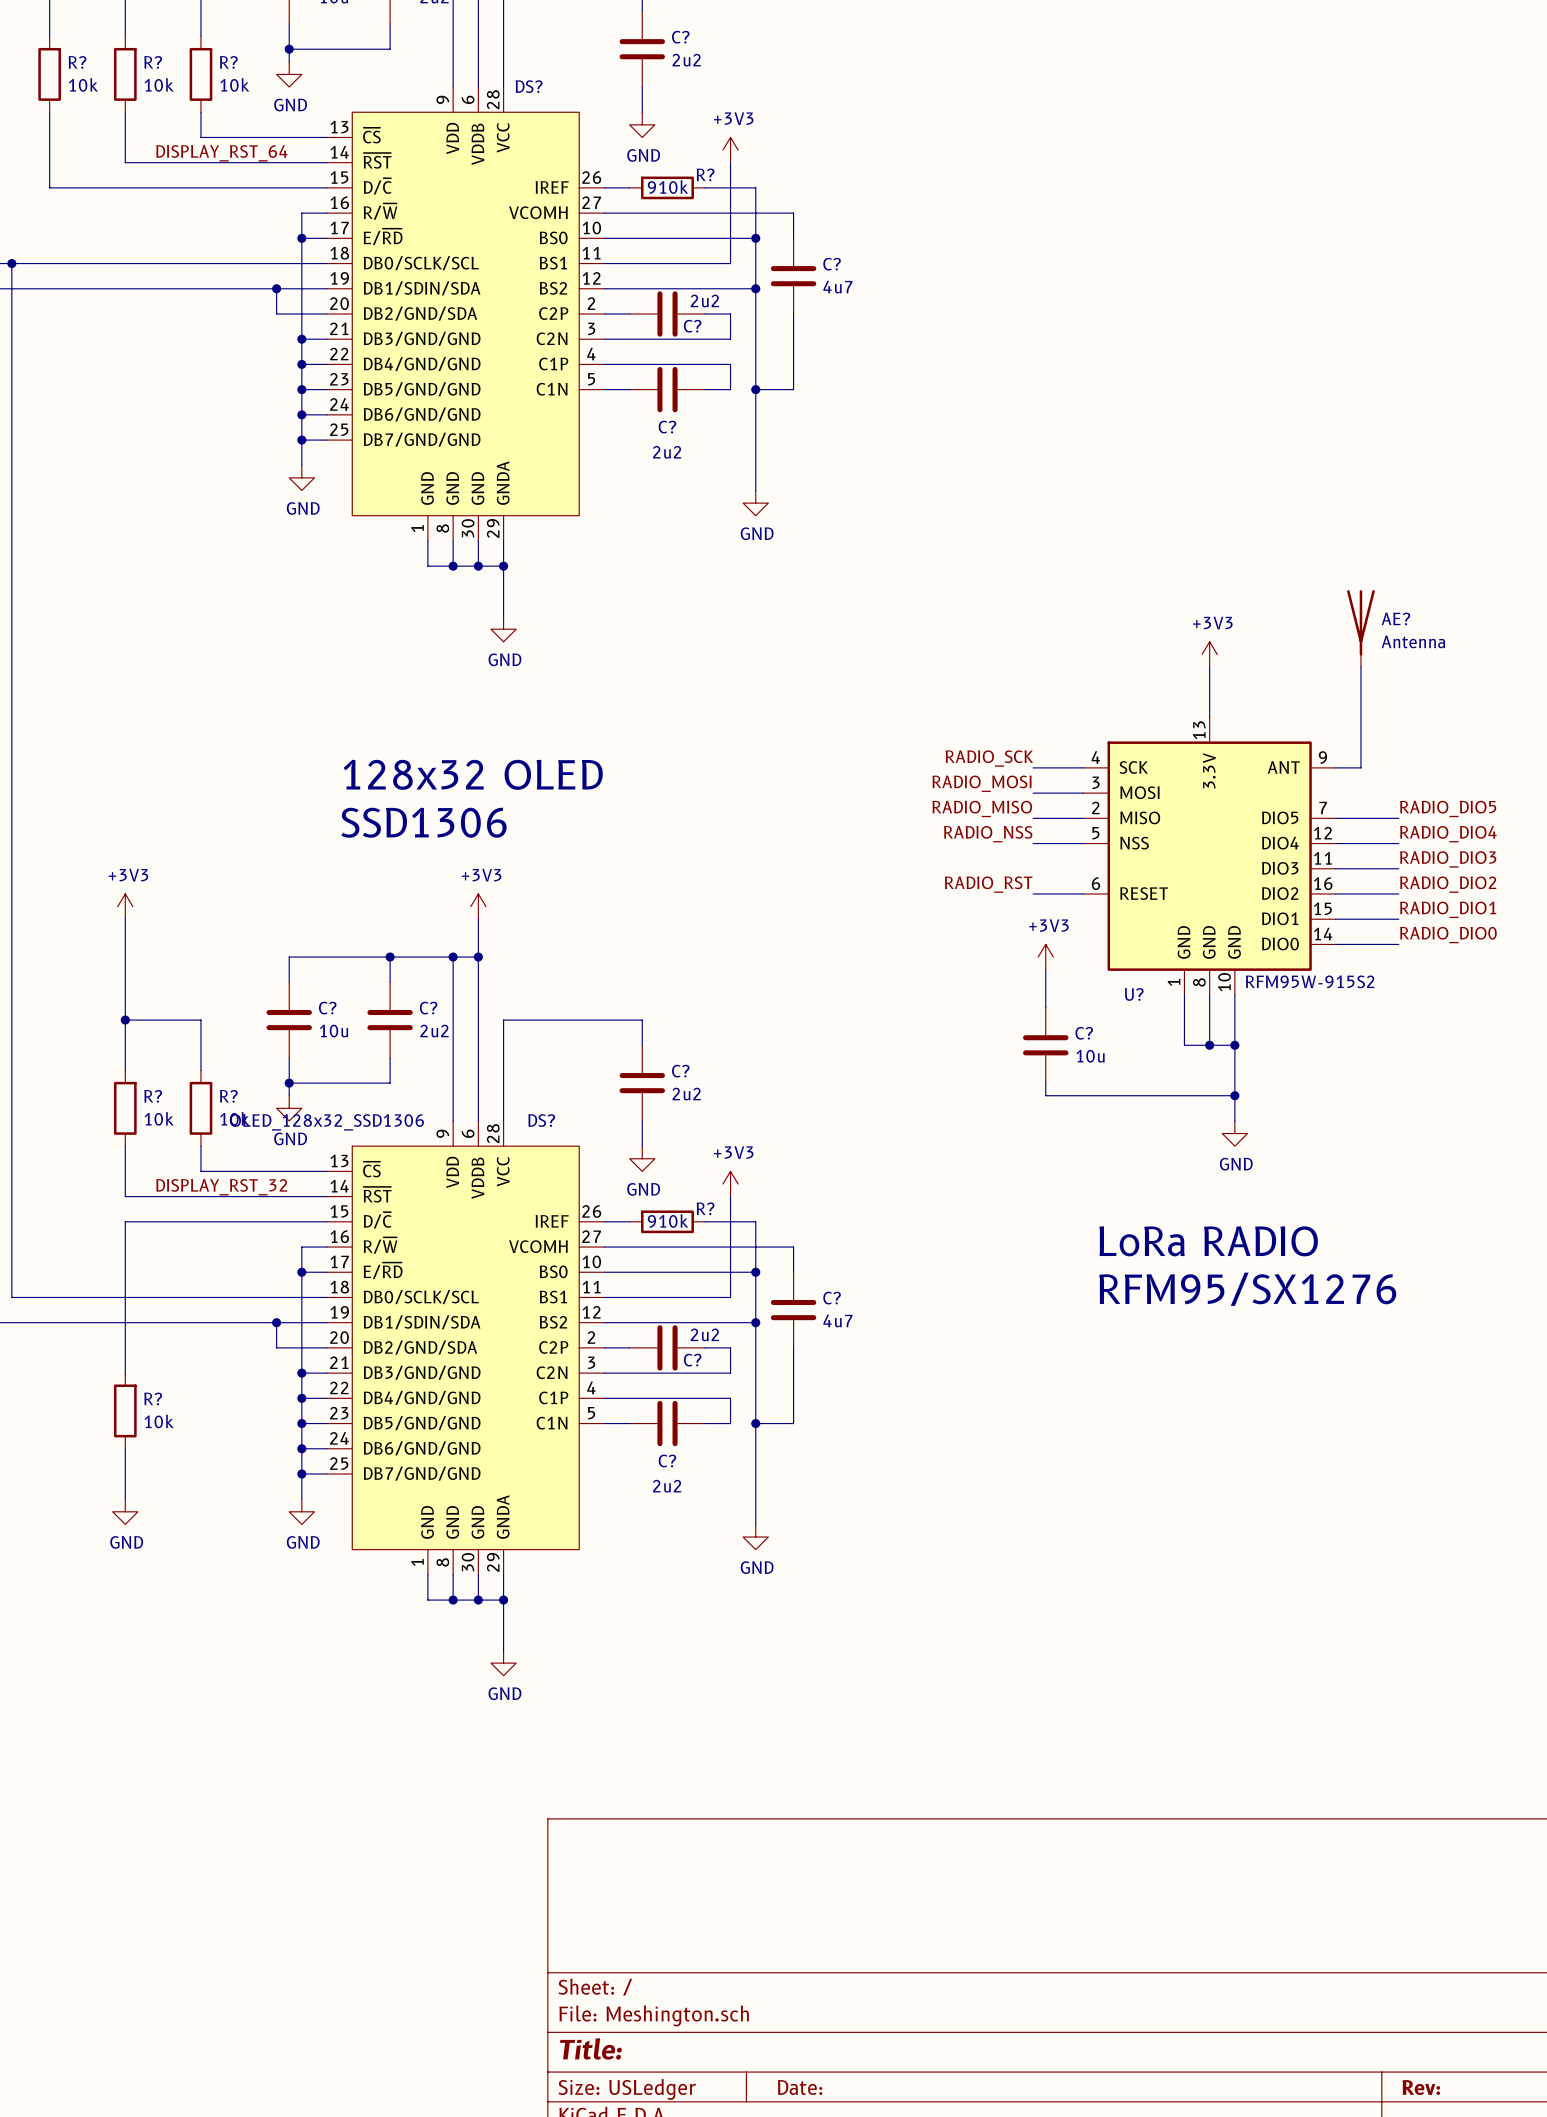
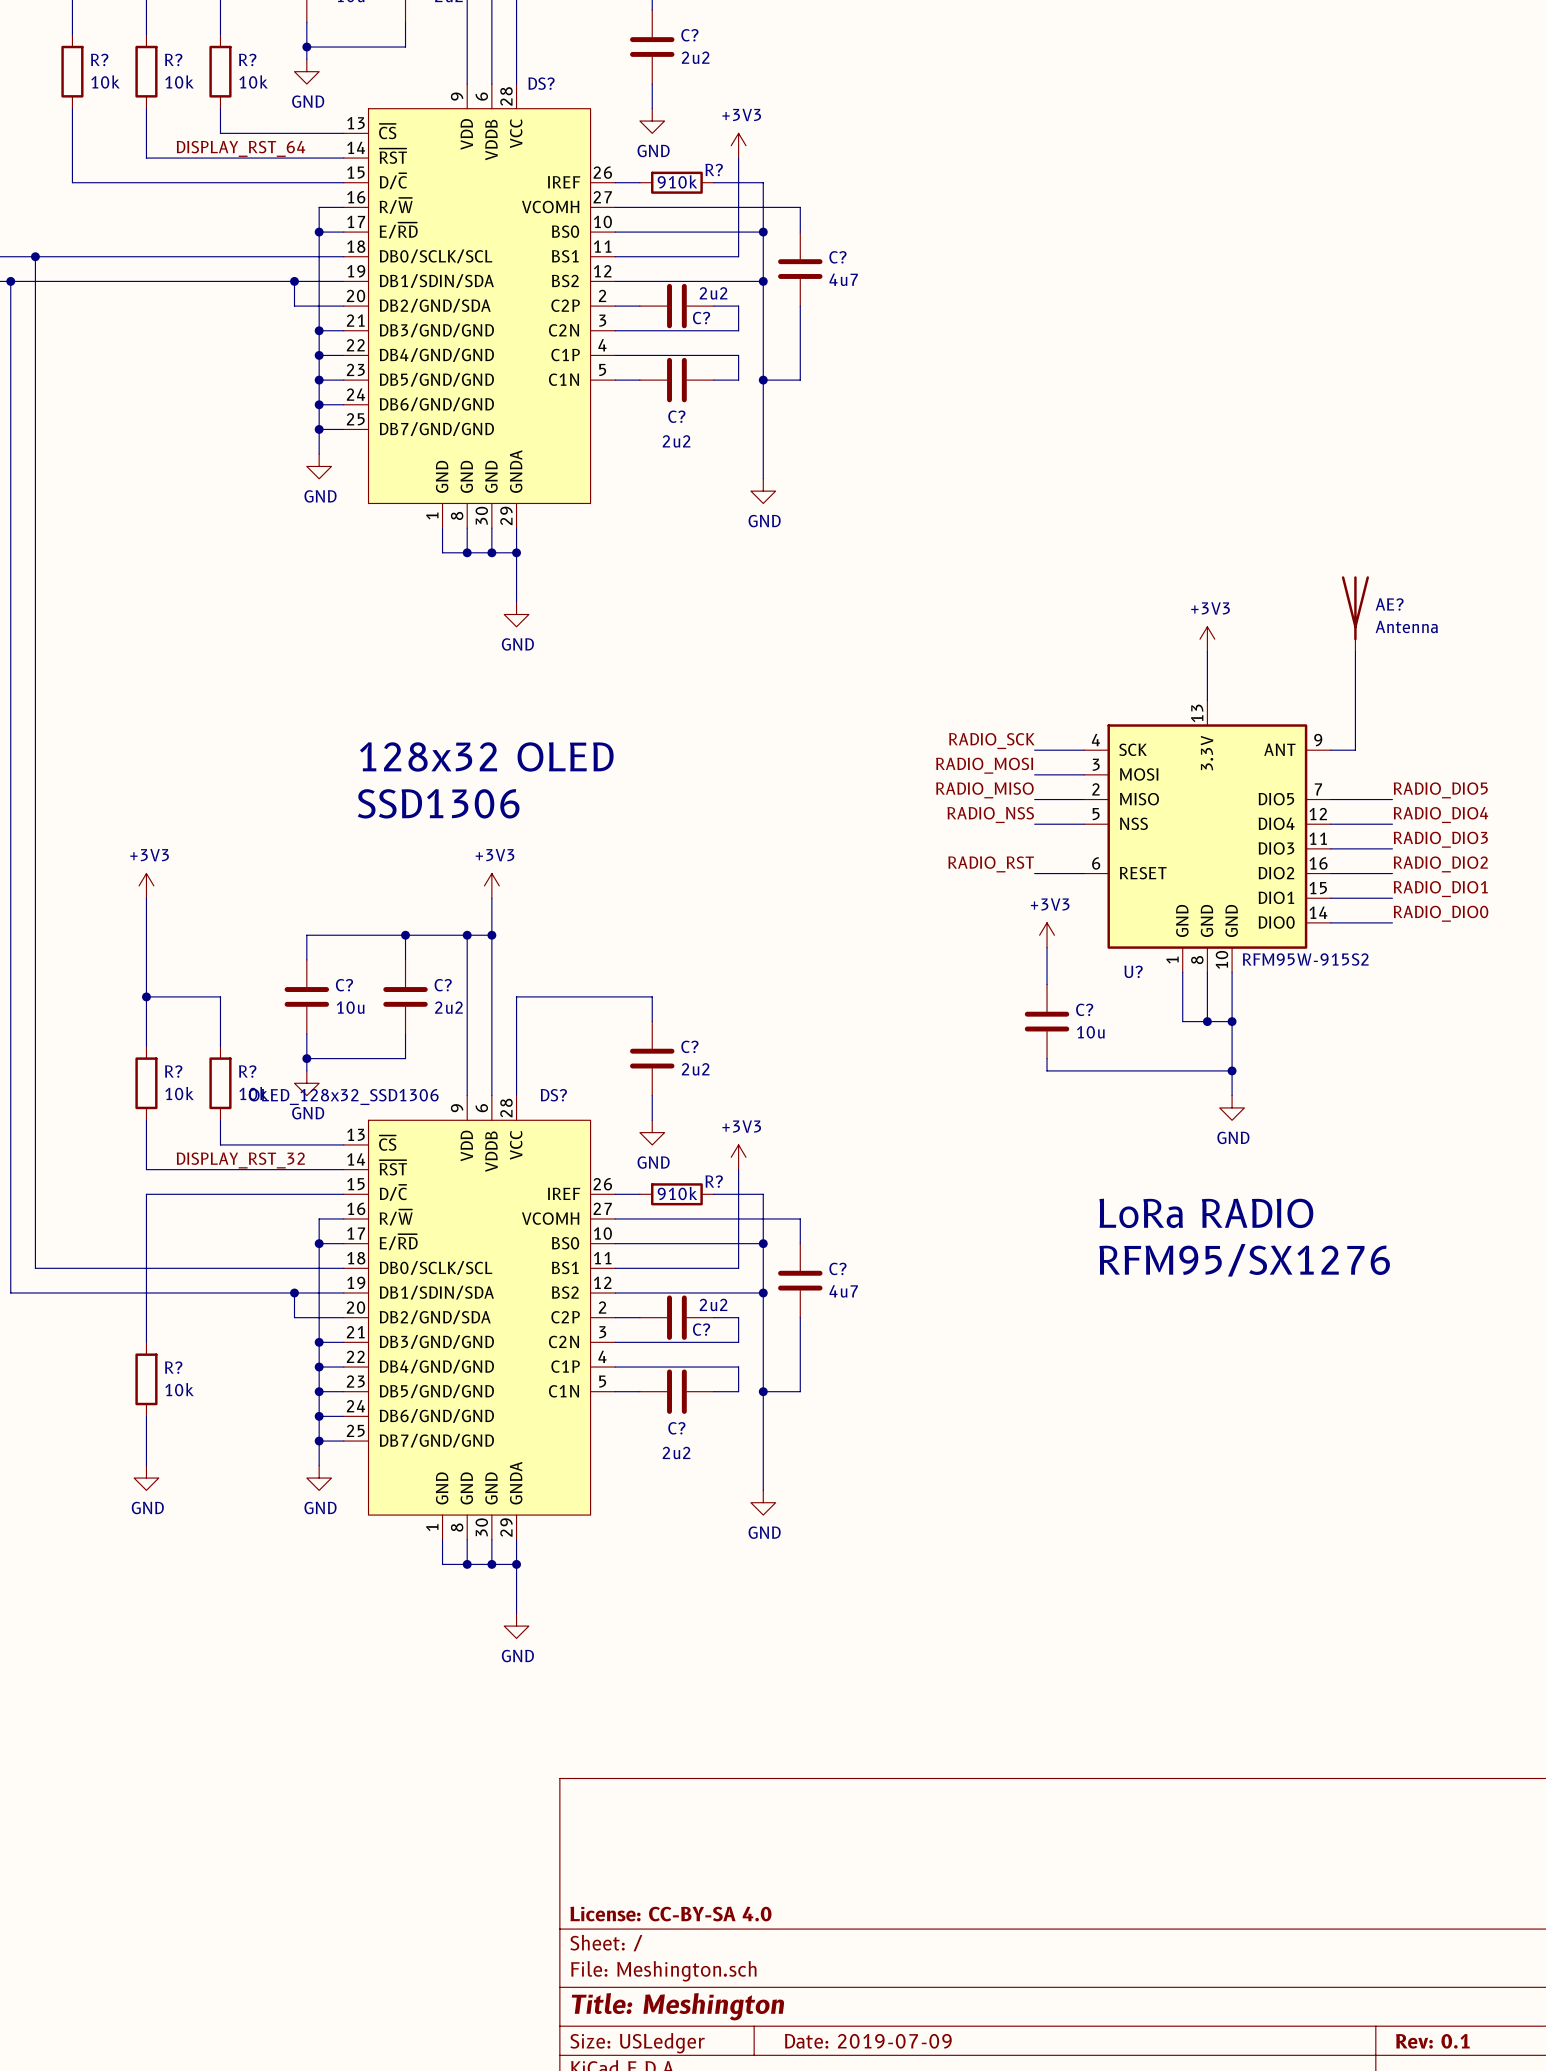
title block: none -> License: CC-BY-SA 4.0 (670, 1914)
title block: Title: (590, 2048) -> Title: Meshington (677, 2006)
title block: Date: (800, 2087) -> Date: 2019-07-09 (868, 2041)
title block: Rev: (1421, 2087) -> Rev: 0.1 (1432, 2041)

